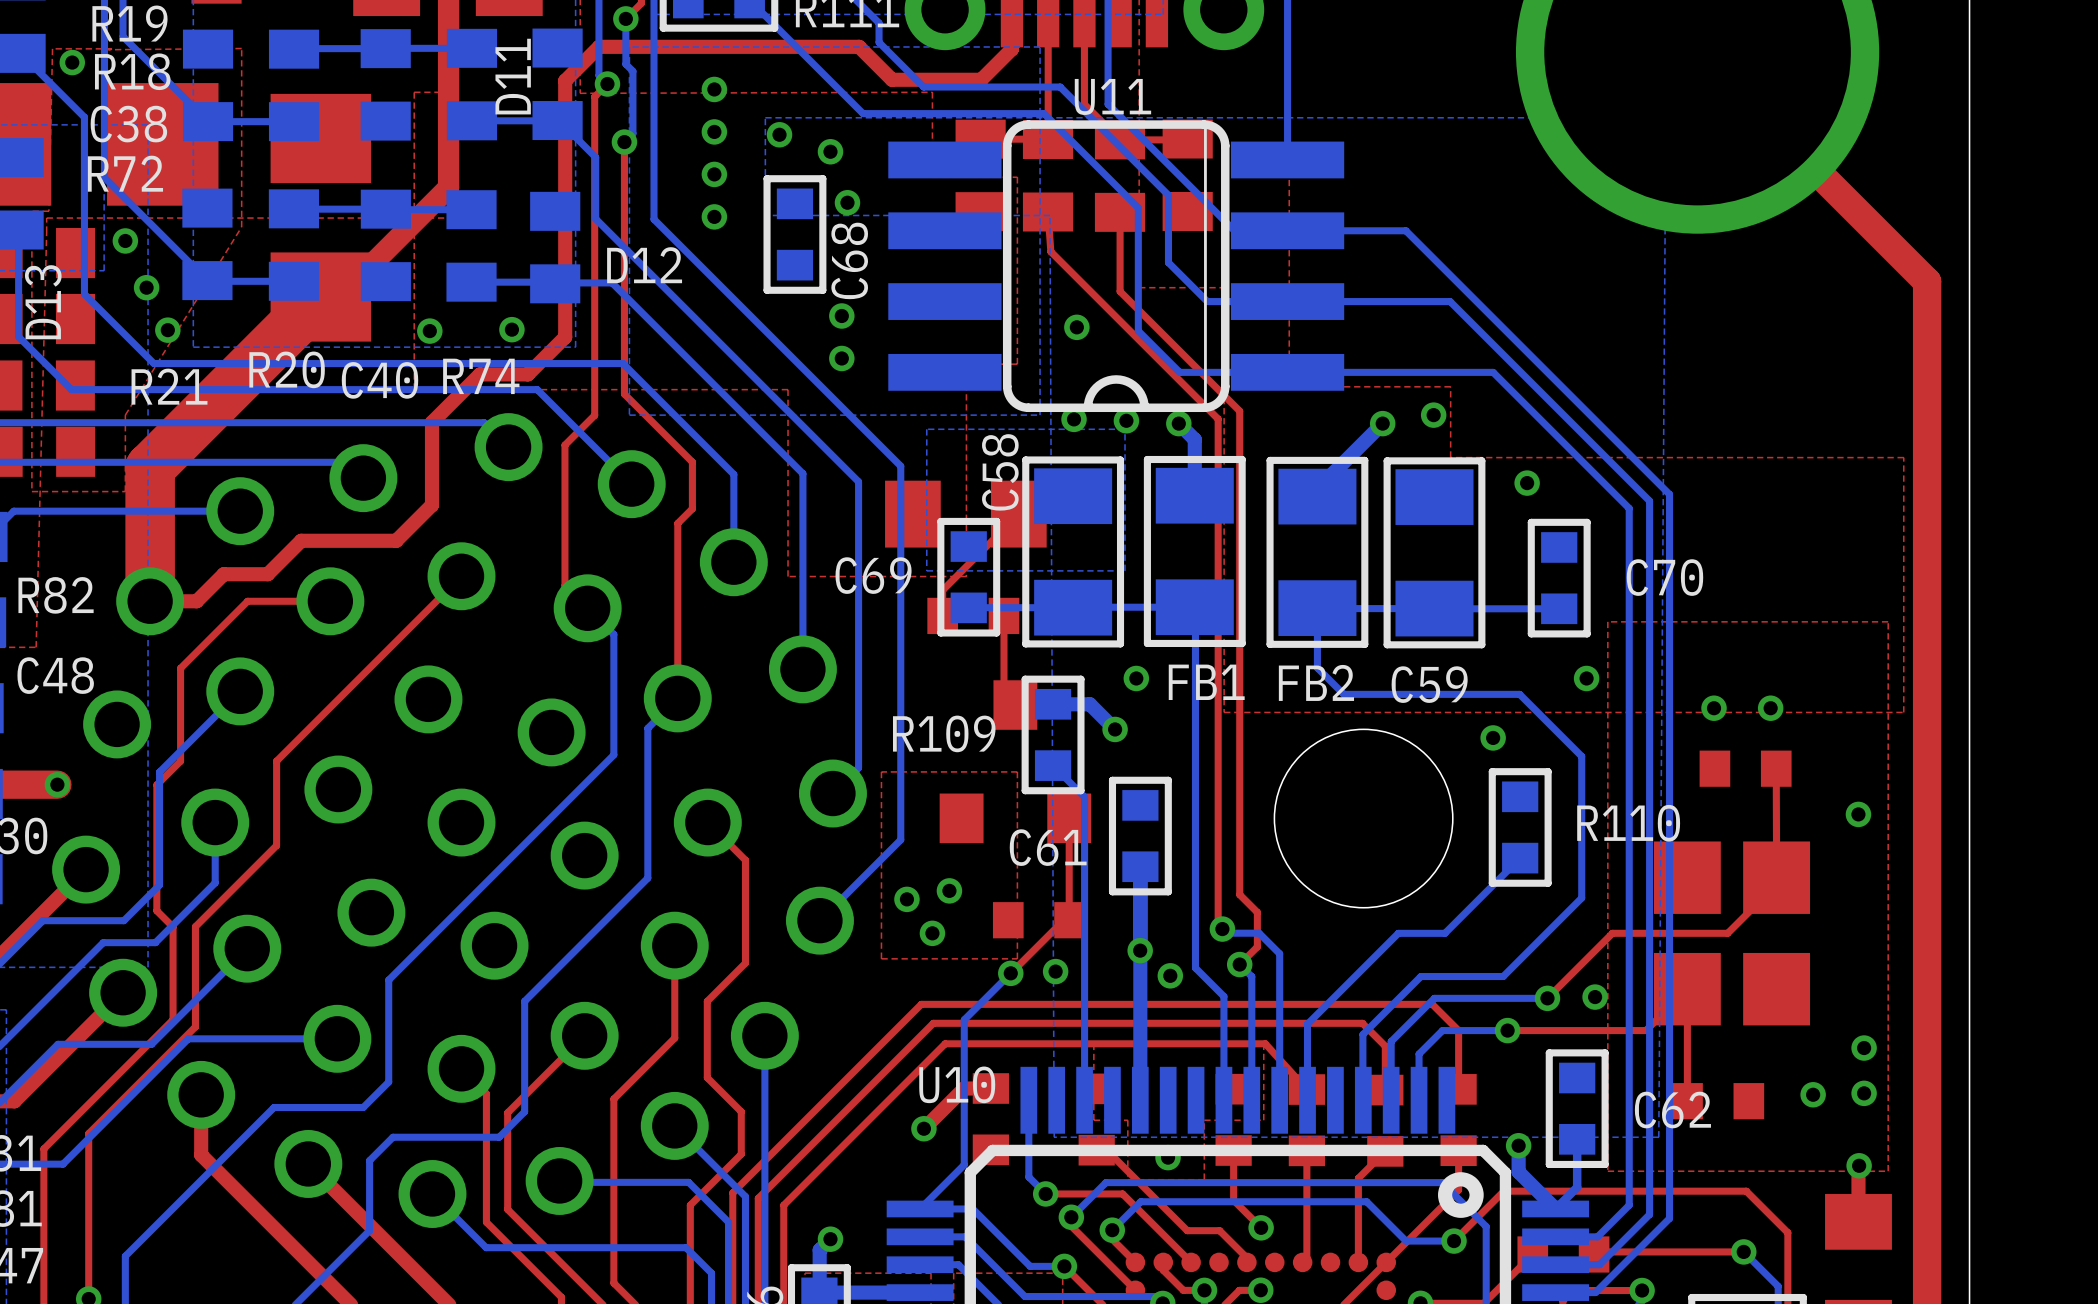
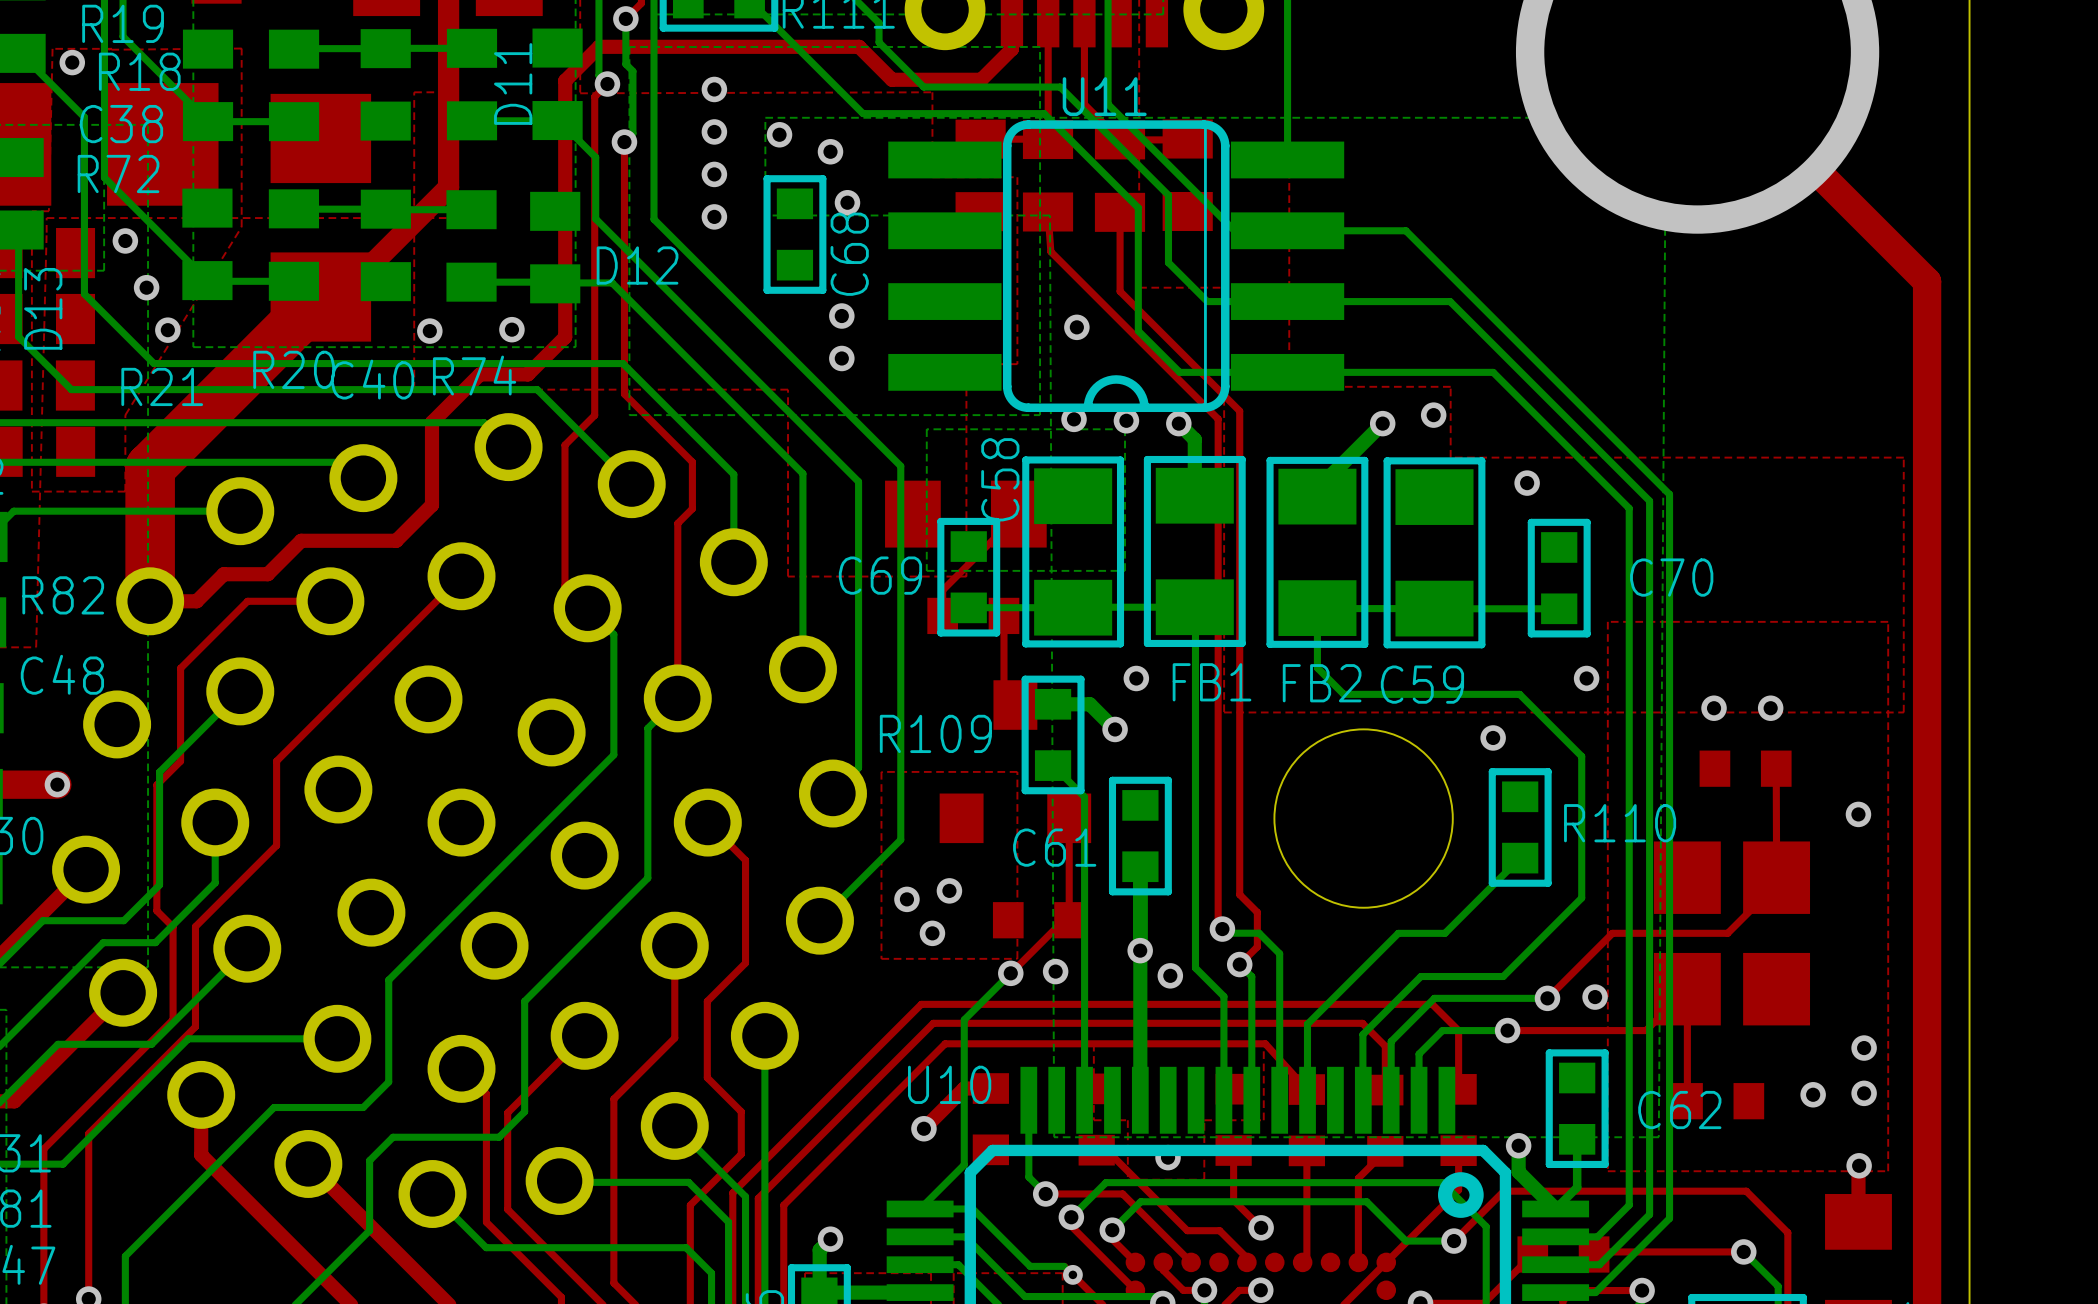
via position: (1064, 1266) -> (1072, 1274)

